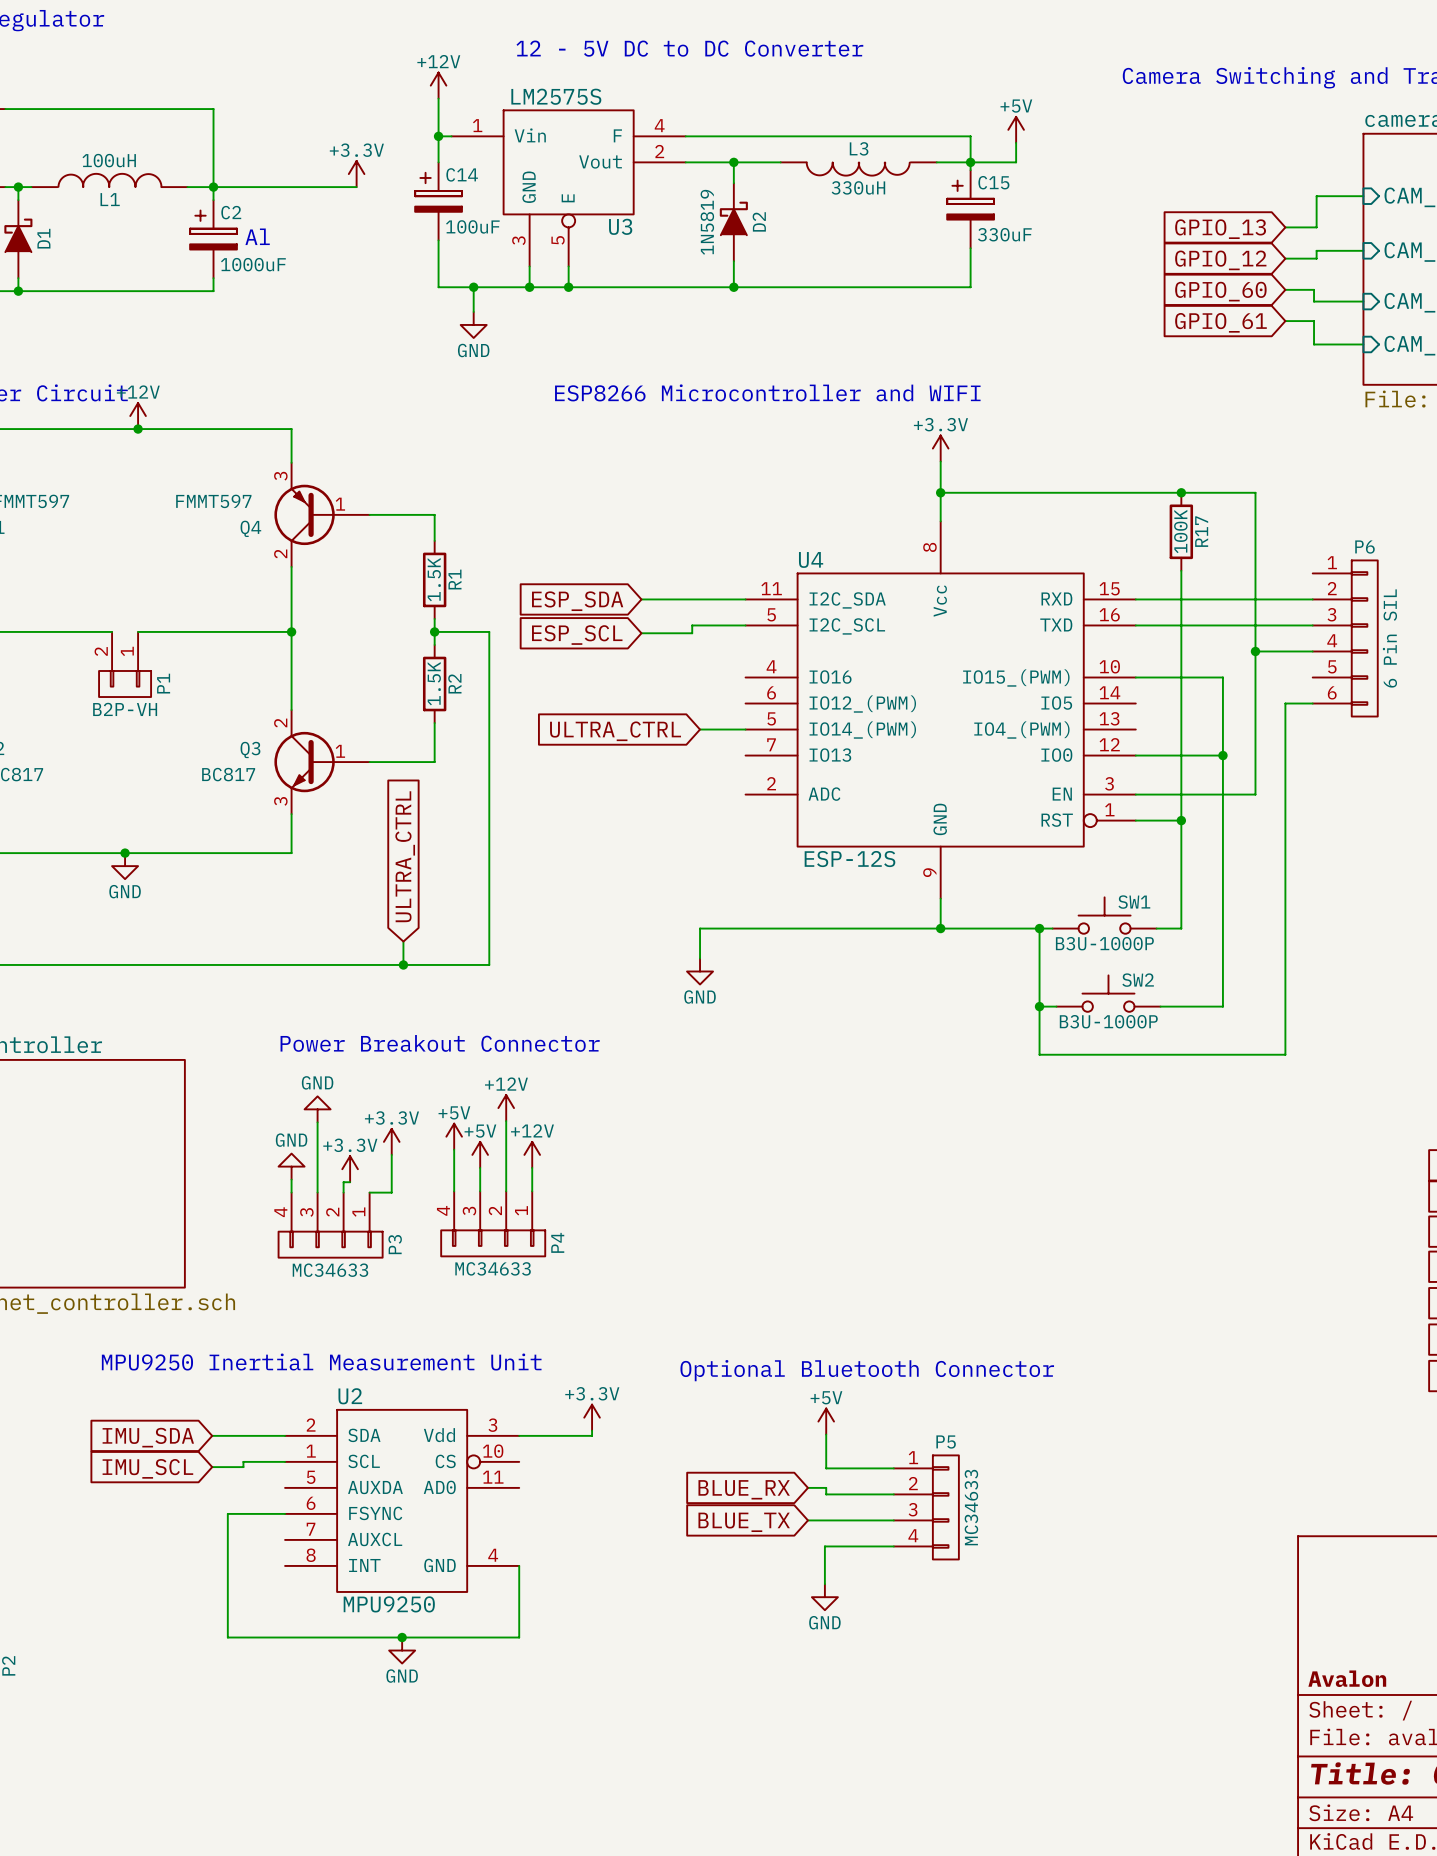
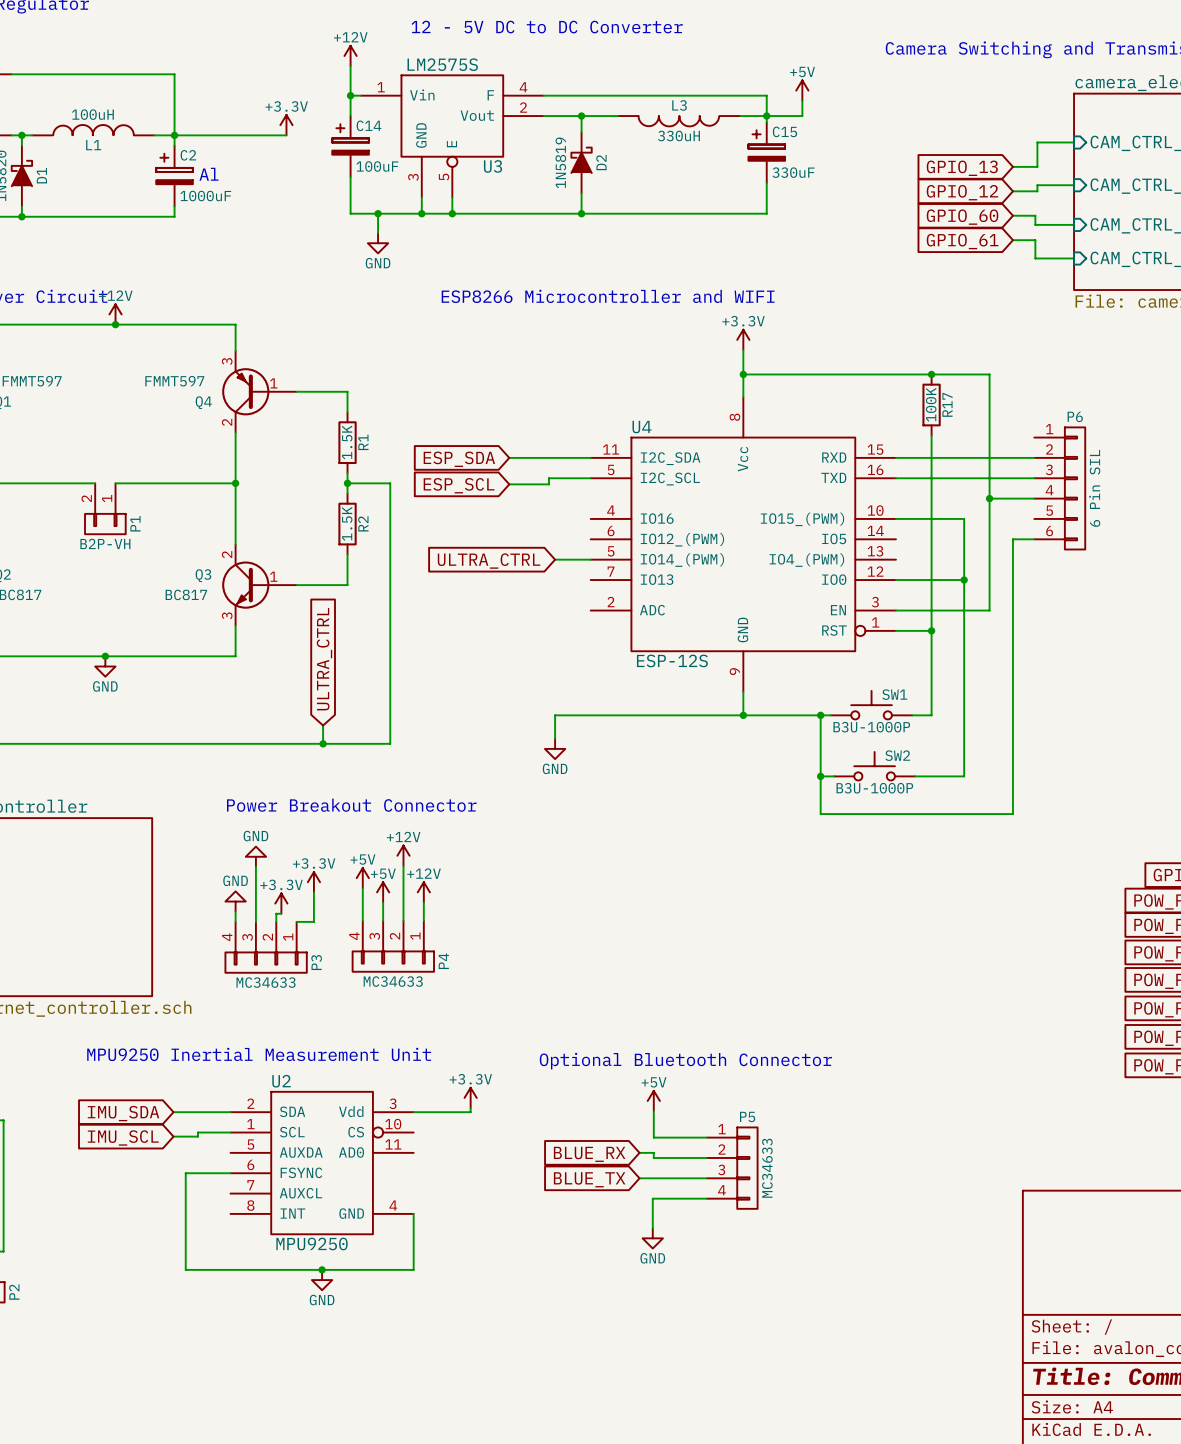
title block: Avalon (1347, 1678) -> none

